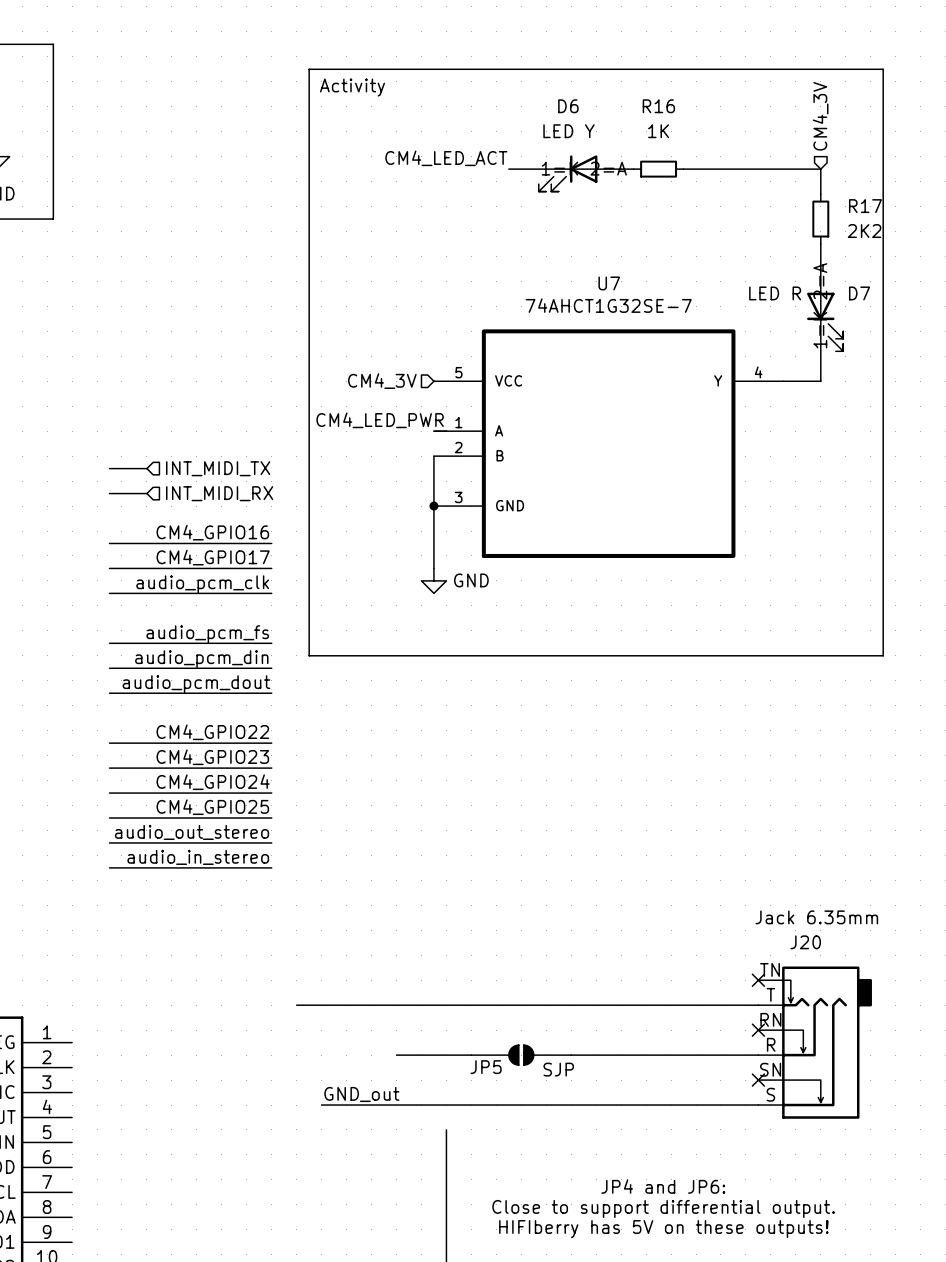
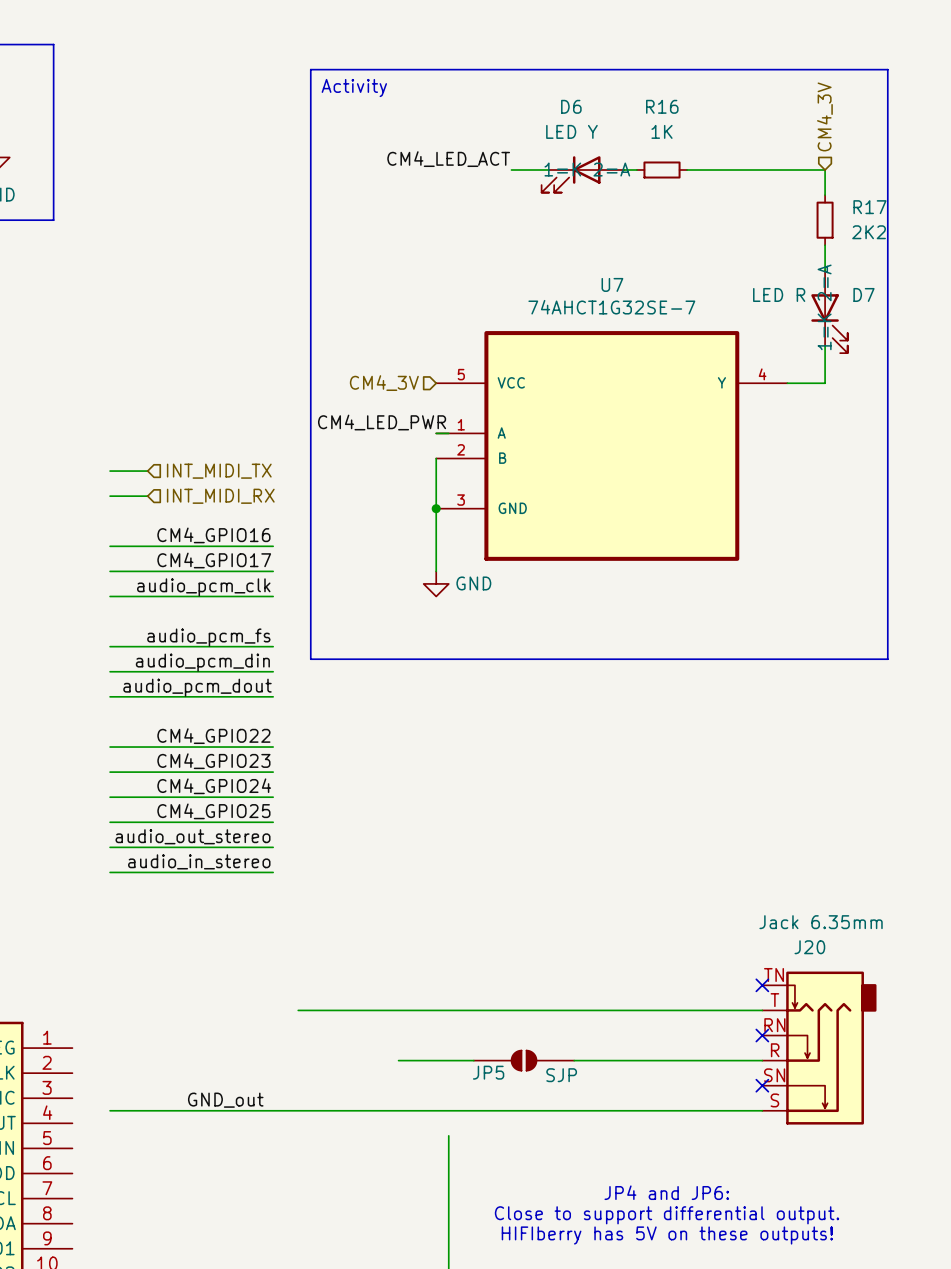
label position: GND_out (361, 1094) -> GND_out (225, 1100)
wire: none -> (110, 1110) (323, 1110)

